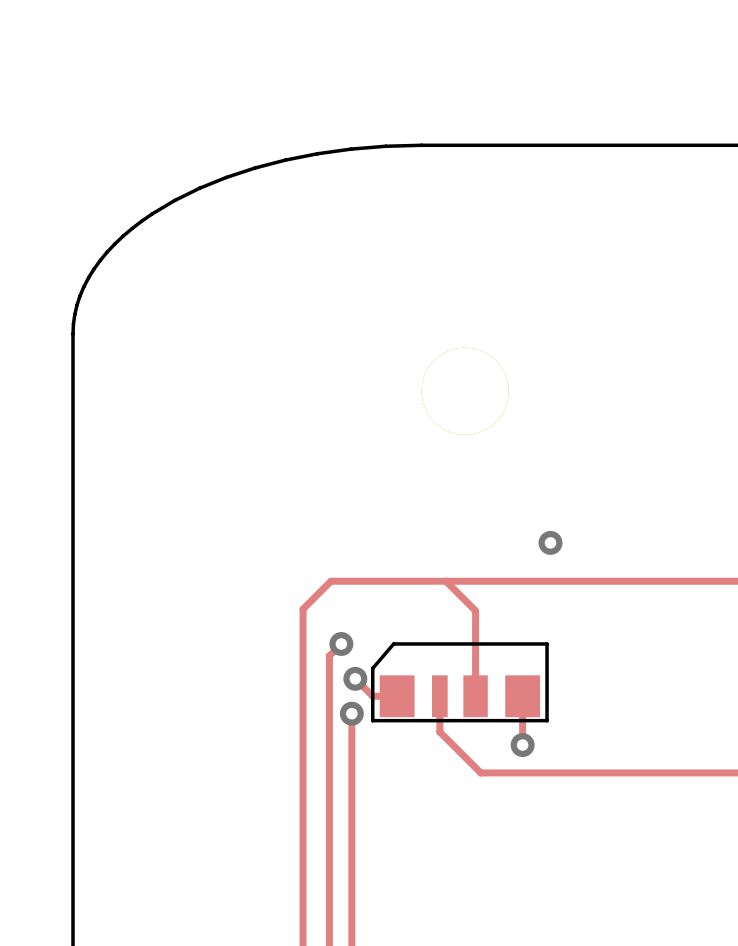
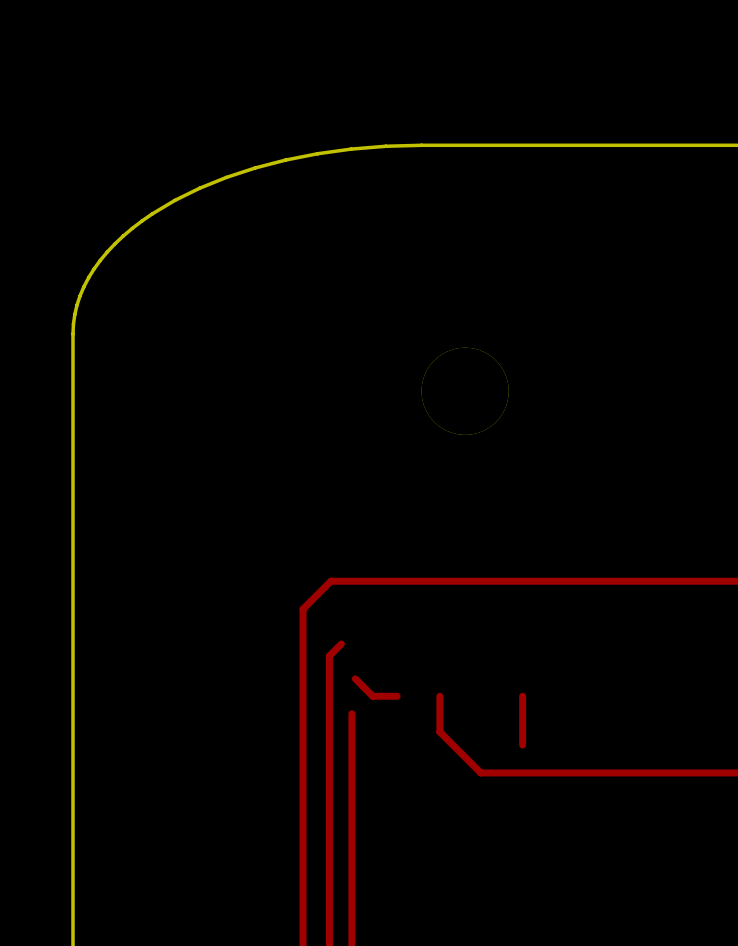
via: (550, 542) -> none
track: (445, 581) (475, 610) (475, 696) -> none
via: (341, 643) -> none
via: (355, 678) -> none
part: (459, 682) -> none
via: (351, 713) -> none
via: (522, 745) -> none

